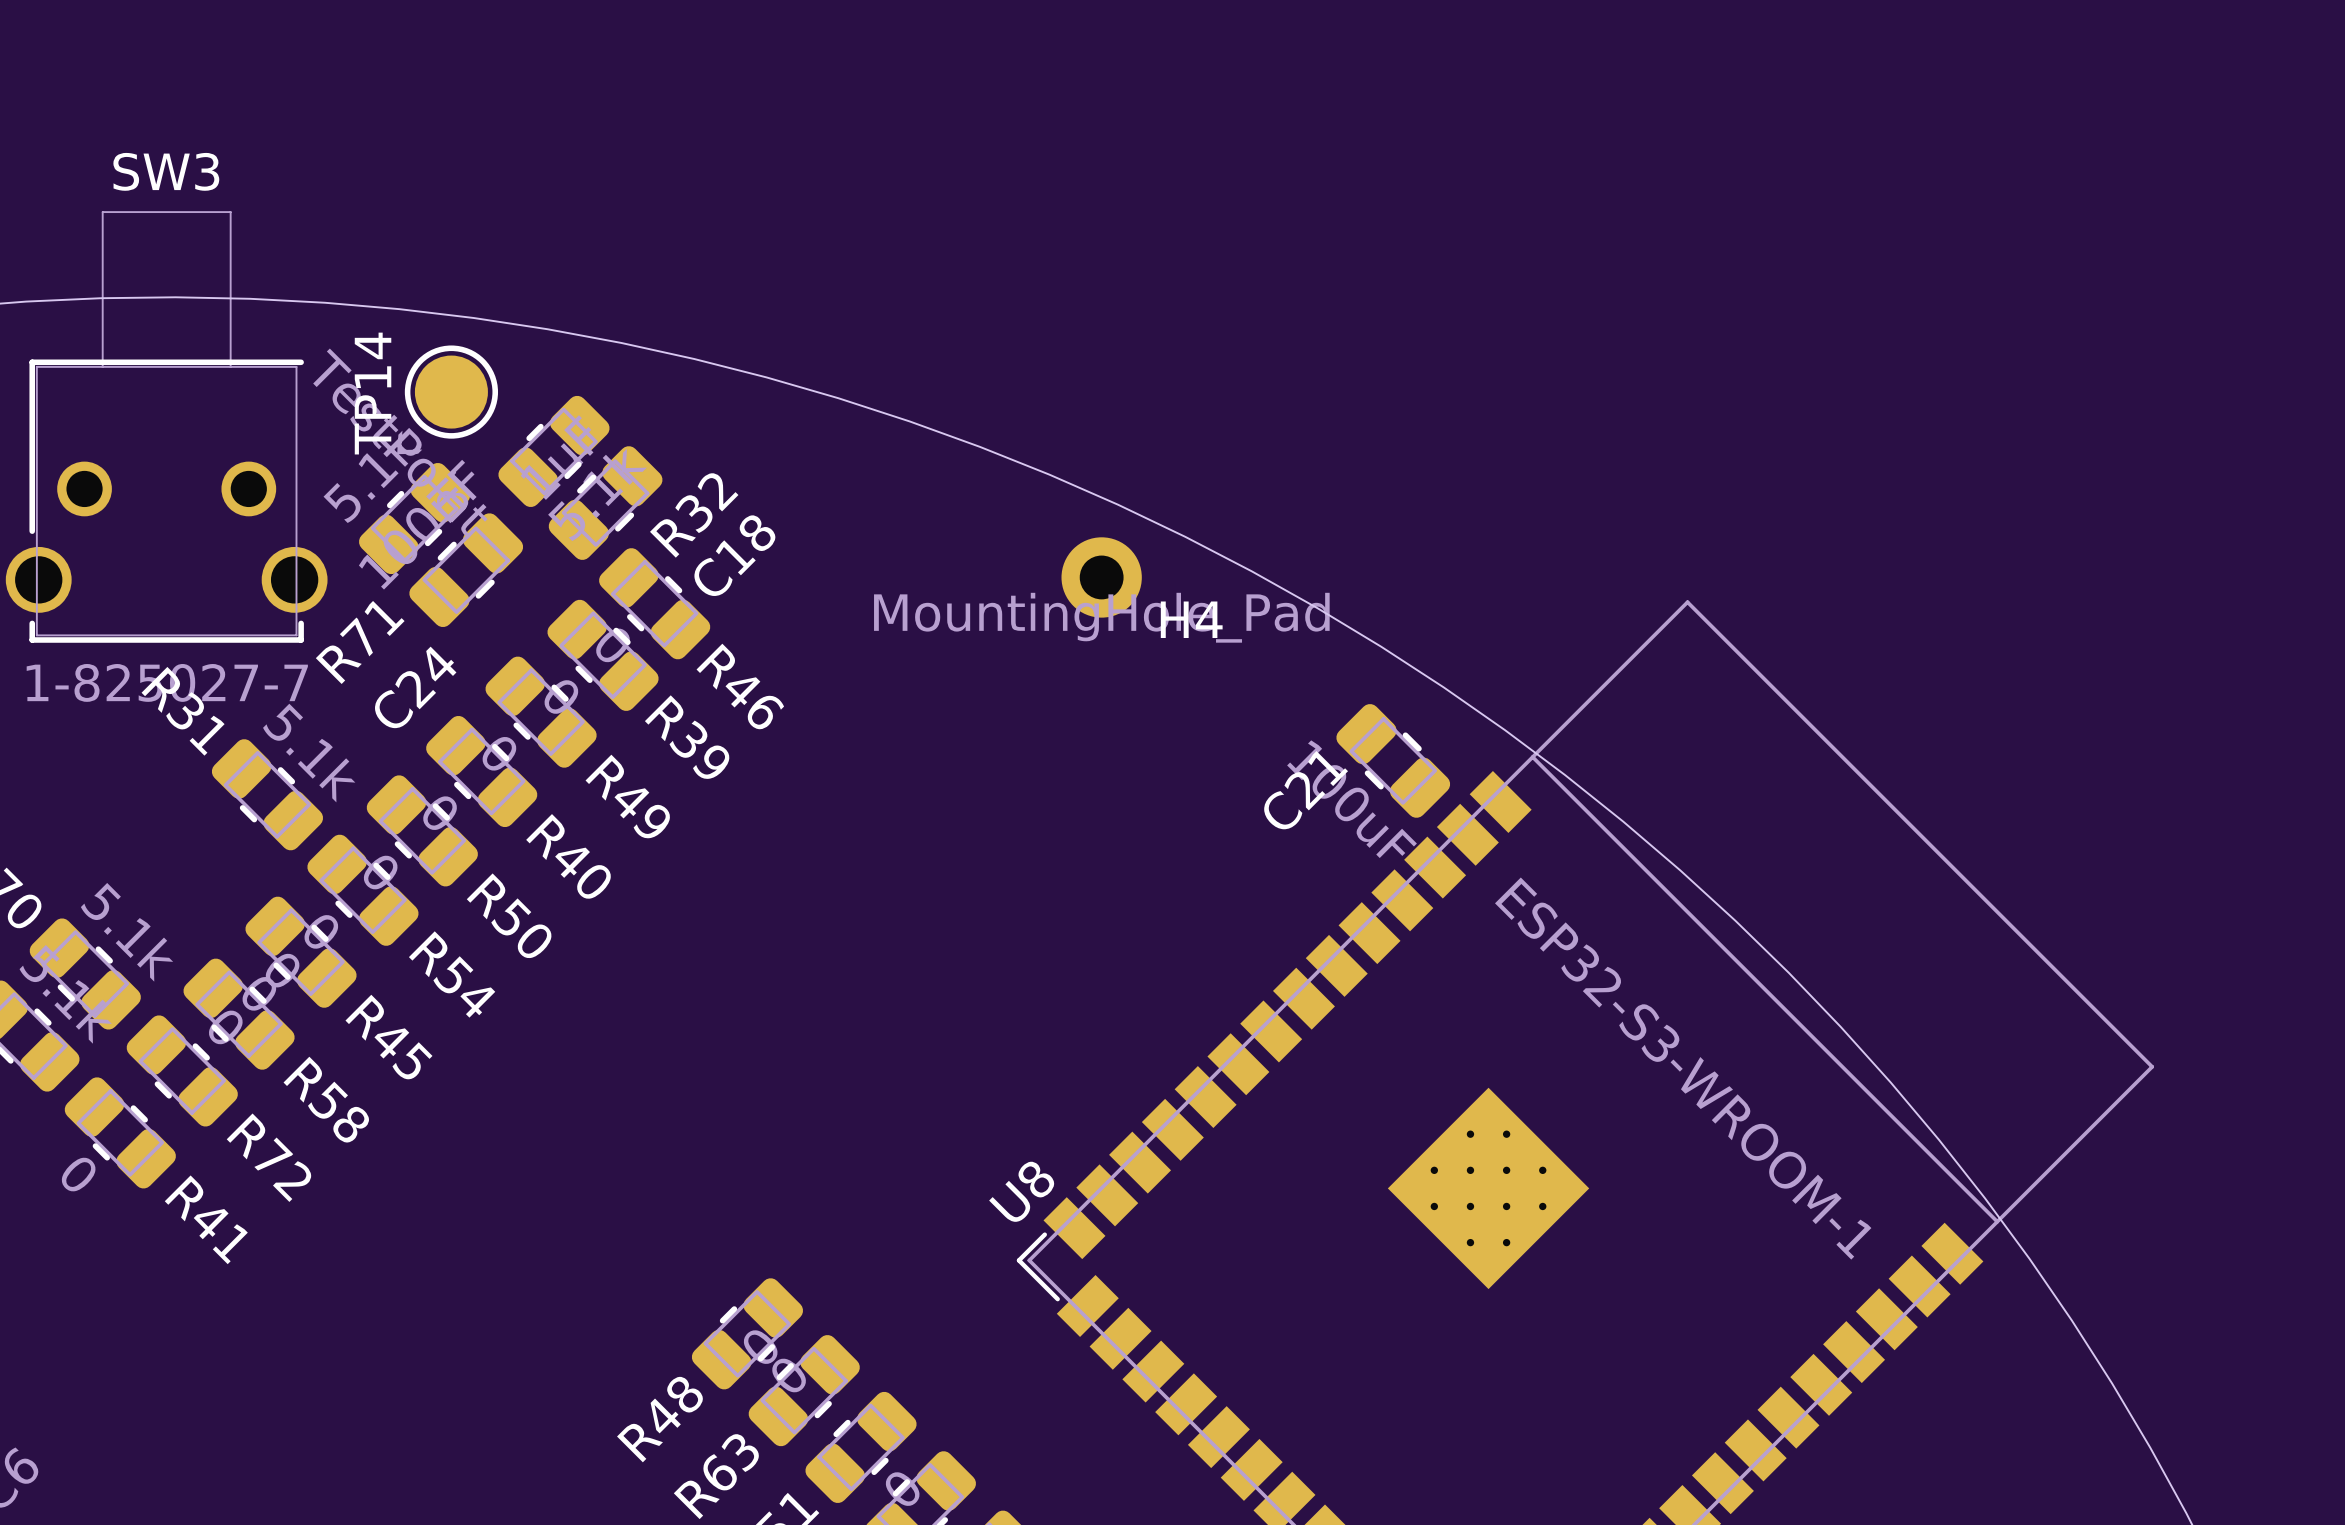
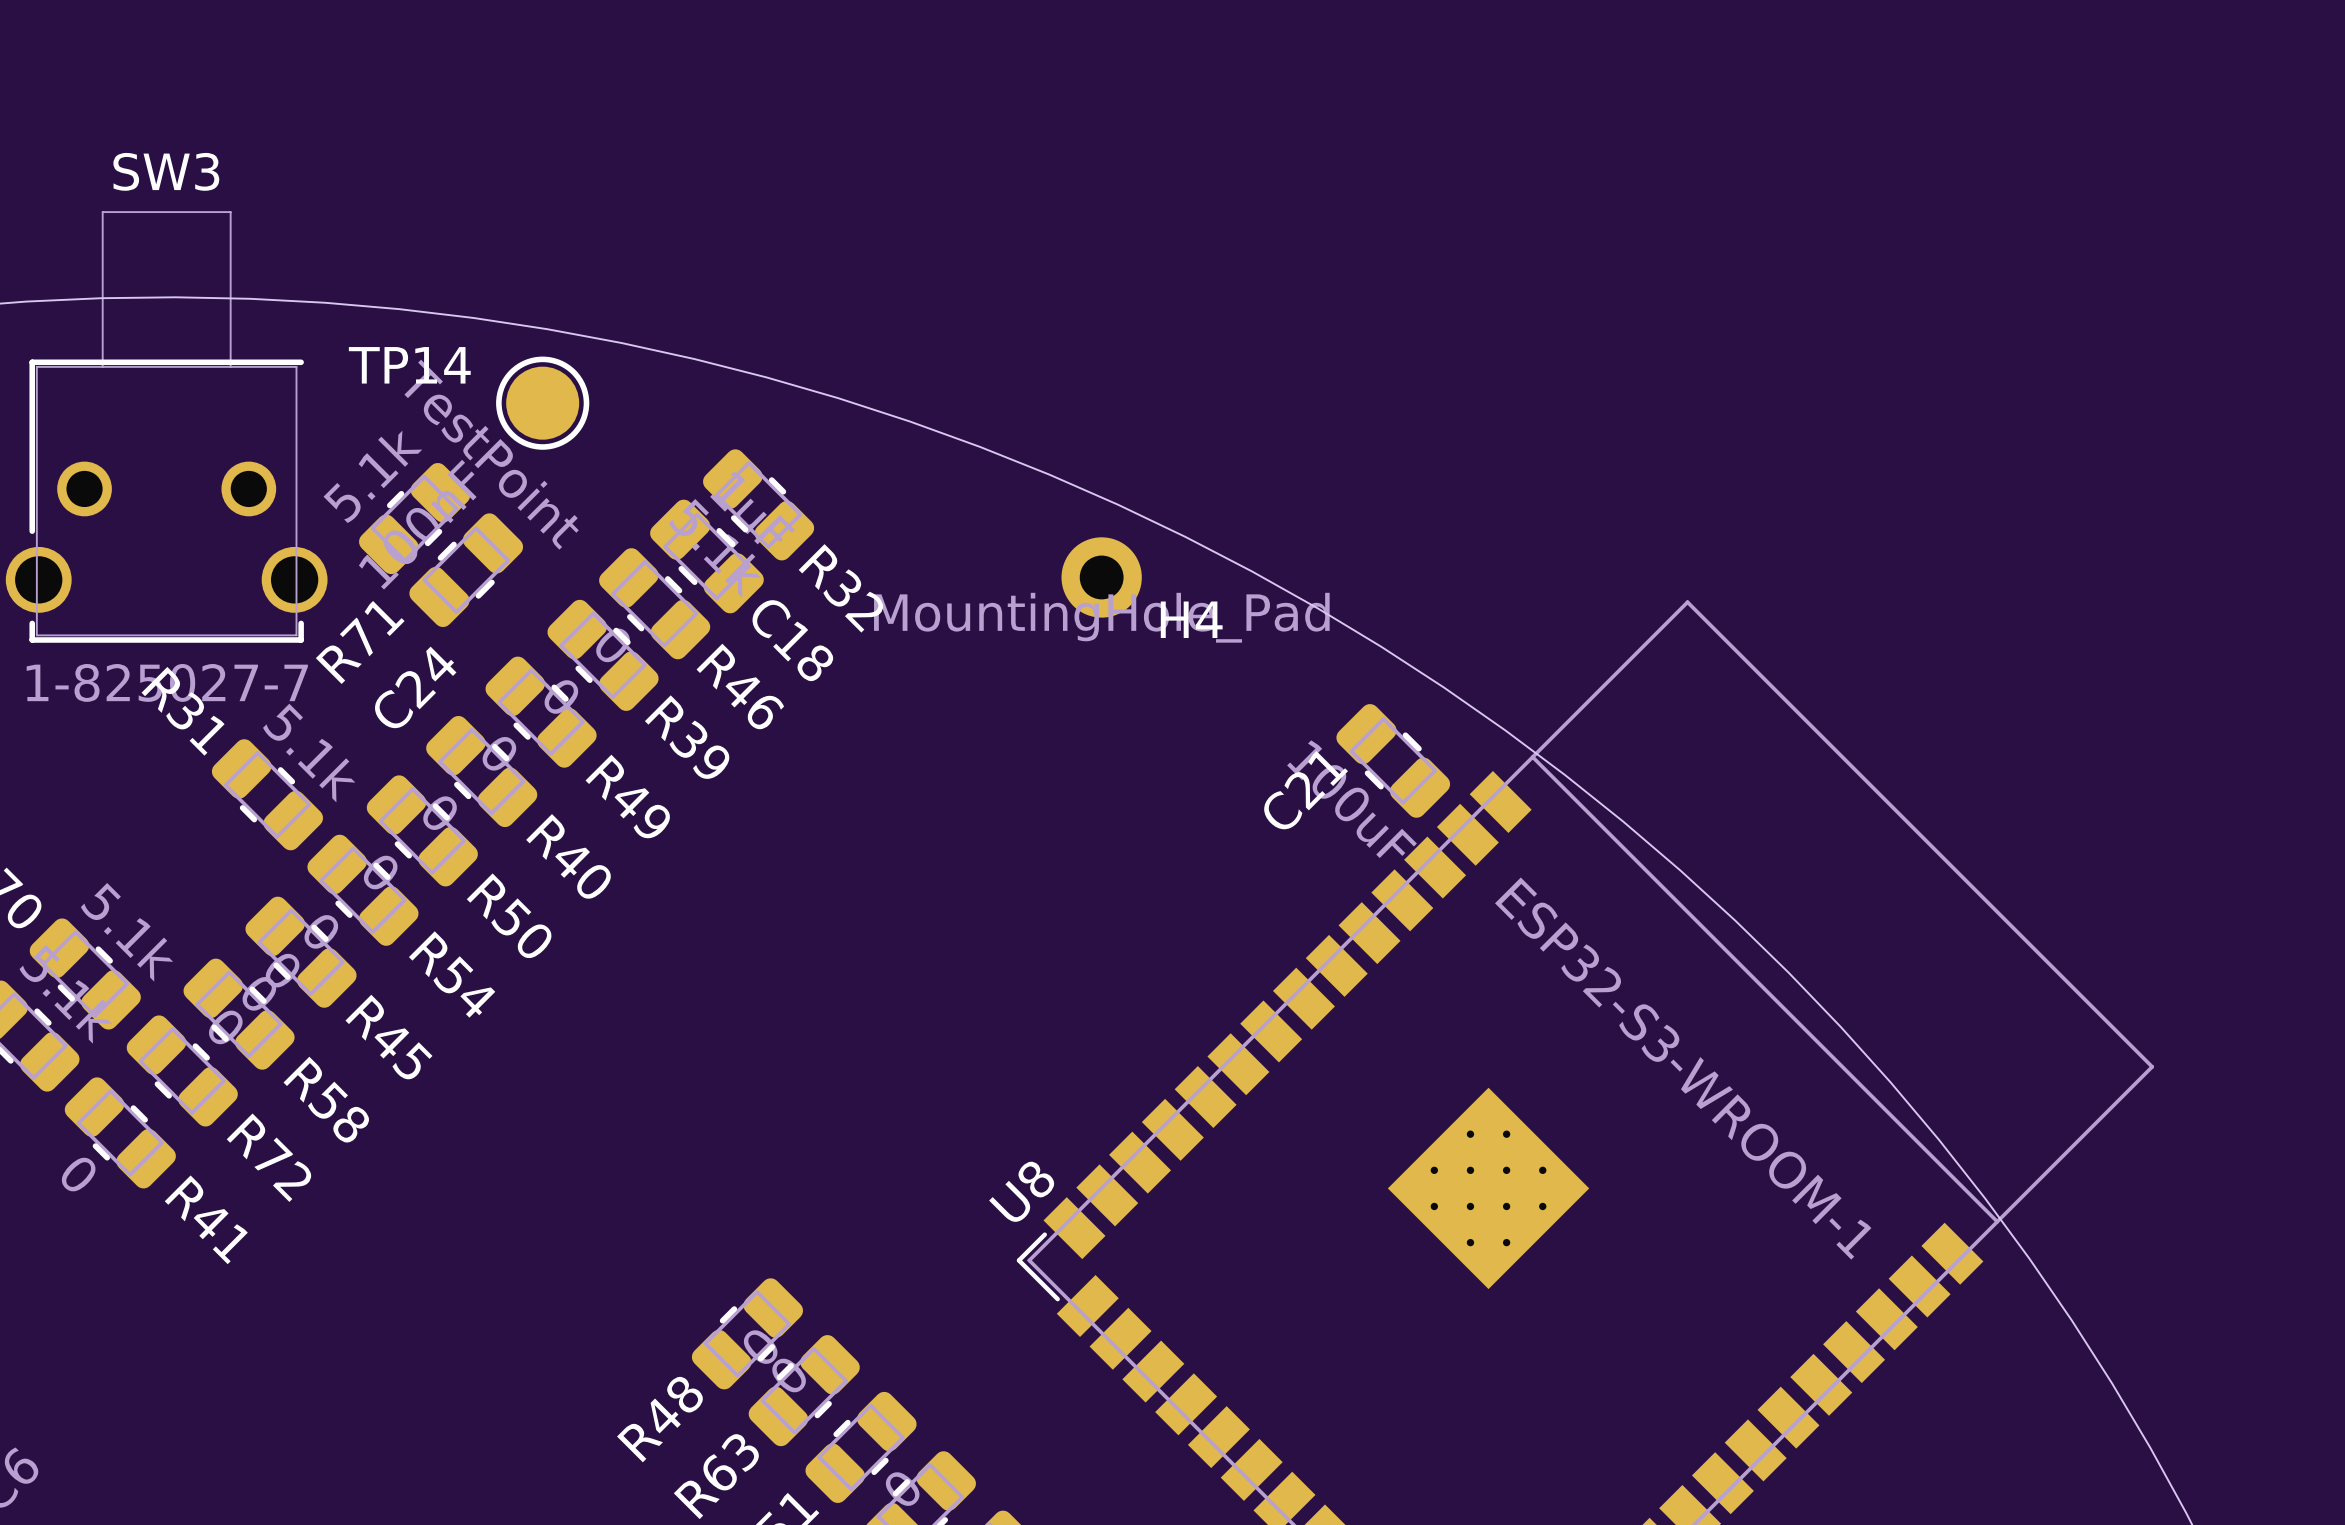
TP14 position: (451, 392) -> (542, 403)
TP14 name rotation: 0° (373, 393) -> 90° clockwise (409, 365)
R32 rotation: 0° (553, 451) -> 90° clockwise (758, 504)
R32 position: (553, 451) -> (758, 504)
C18 rotation: 0° (605, 503) -> 90° clockwise (706, 556)
C18 position: (605, 503) -> (706, 556)

